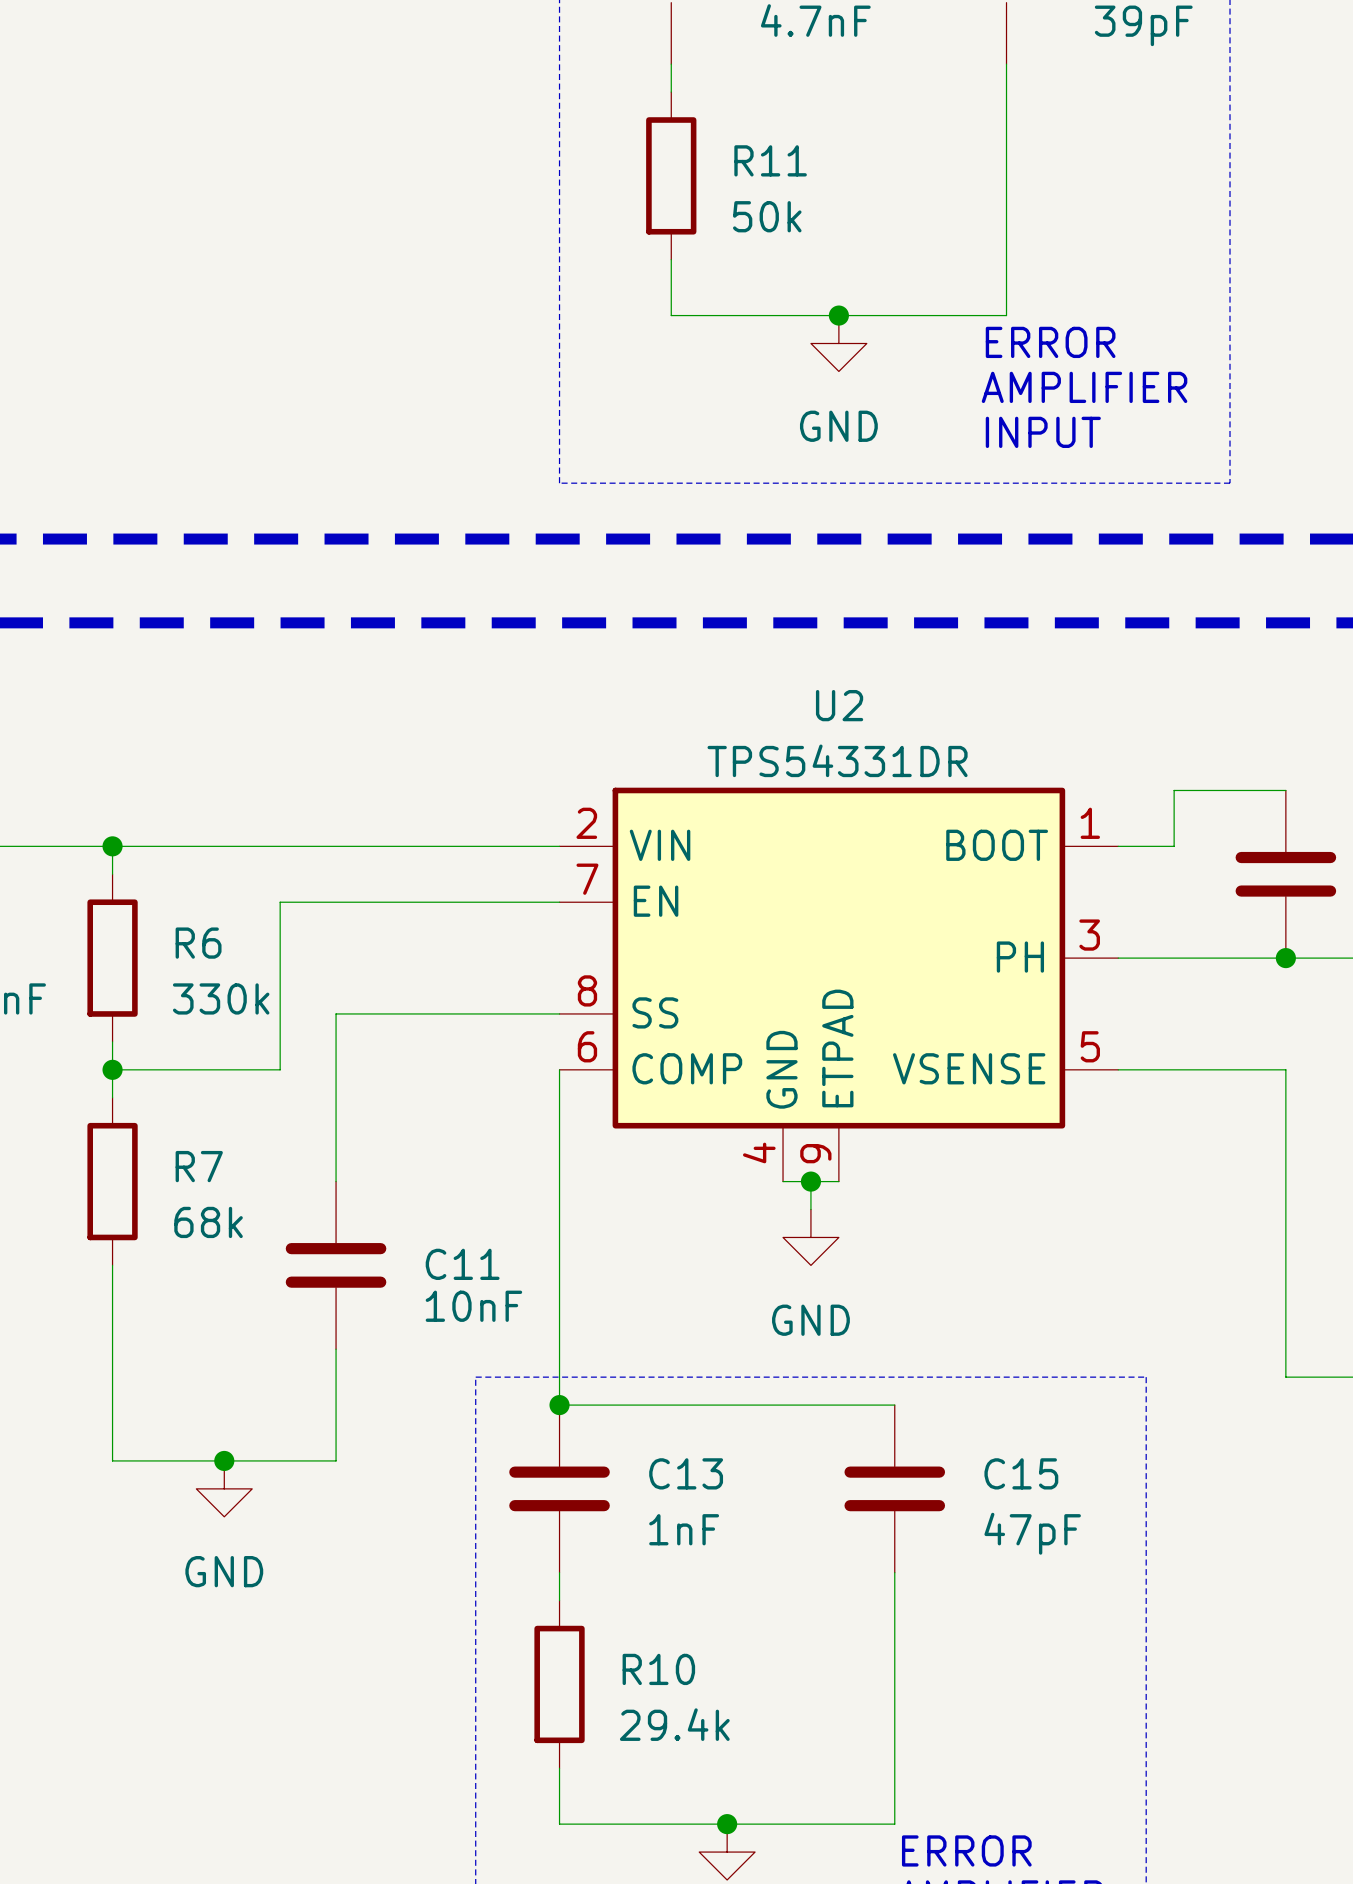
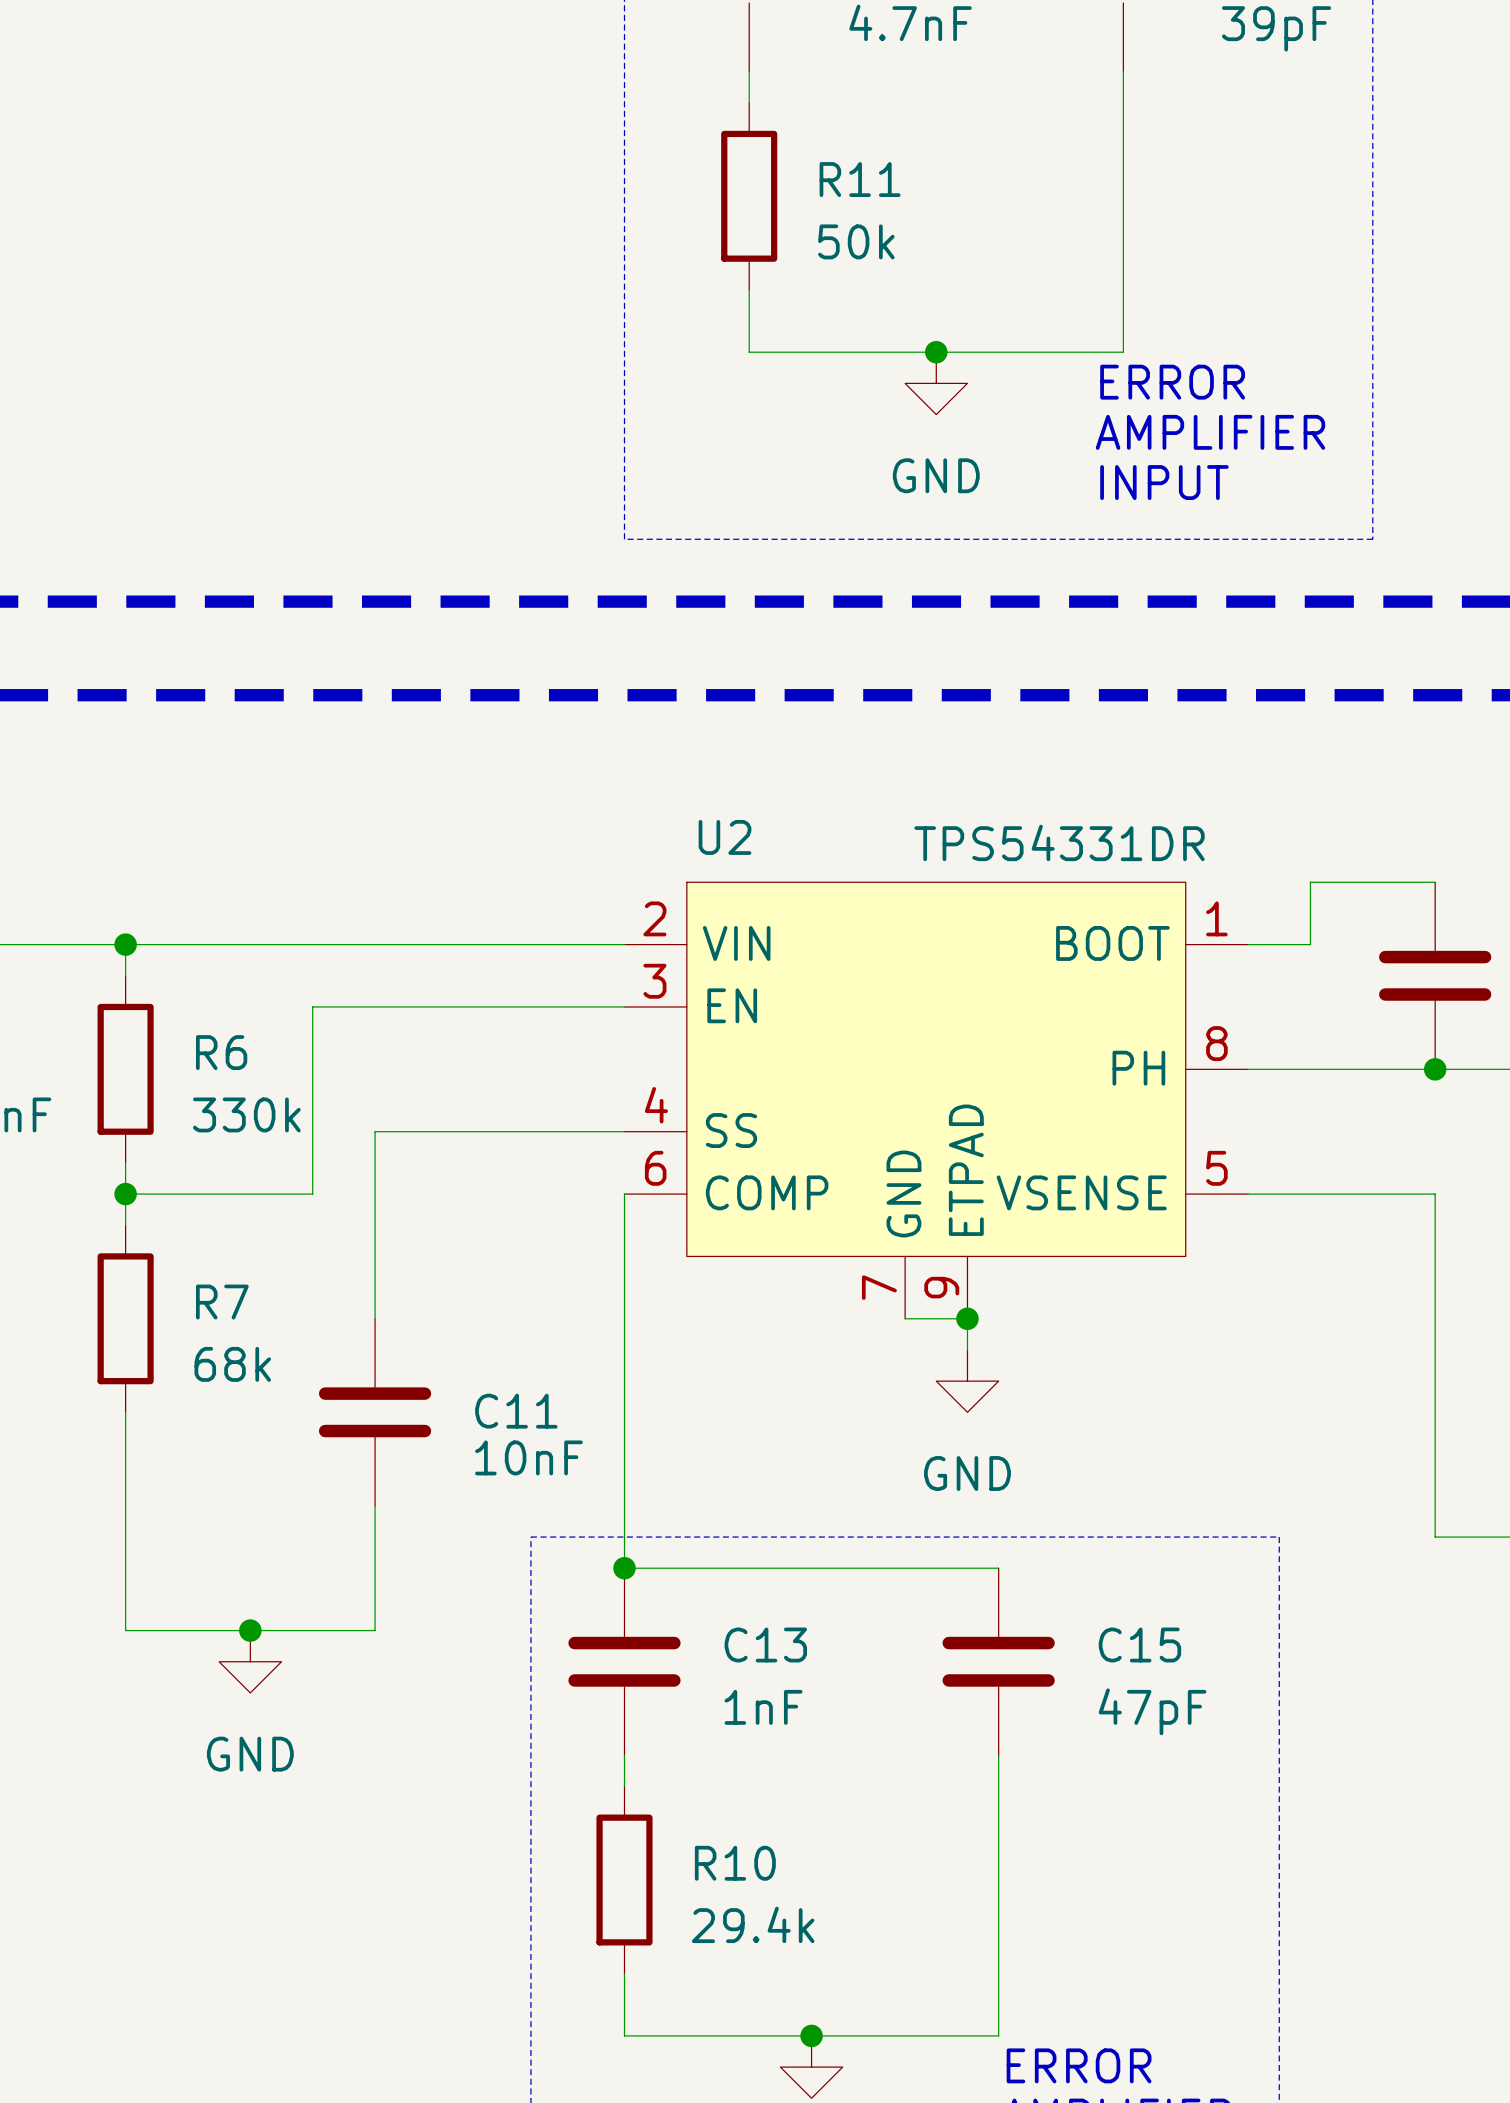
U2 name position: U2 (839, 705) -> U2 (725, 837)
U2 value position: TPS54331DR (837, 760) -> TPS54331DR (1059, 842)
U2 symbol: [559, 787, 1119, 1182] -> [624, 882, 1249, 1319]
wire: (783, 1181) (810, 1181) (810, 1209) -> (936, 1318) (967, 1318) (967, 1349)
junction position: (810, 1181) -> (967, 1318)
power symbol position: GND (810, 1237) -> GND (967, 1381)

